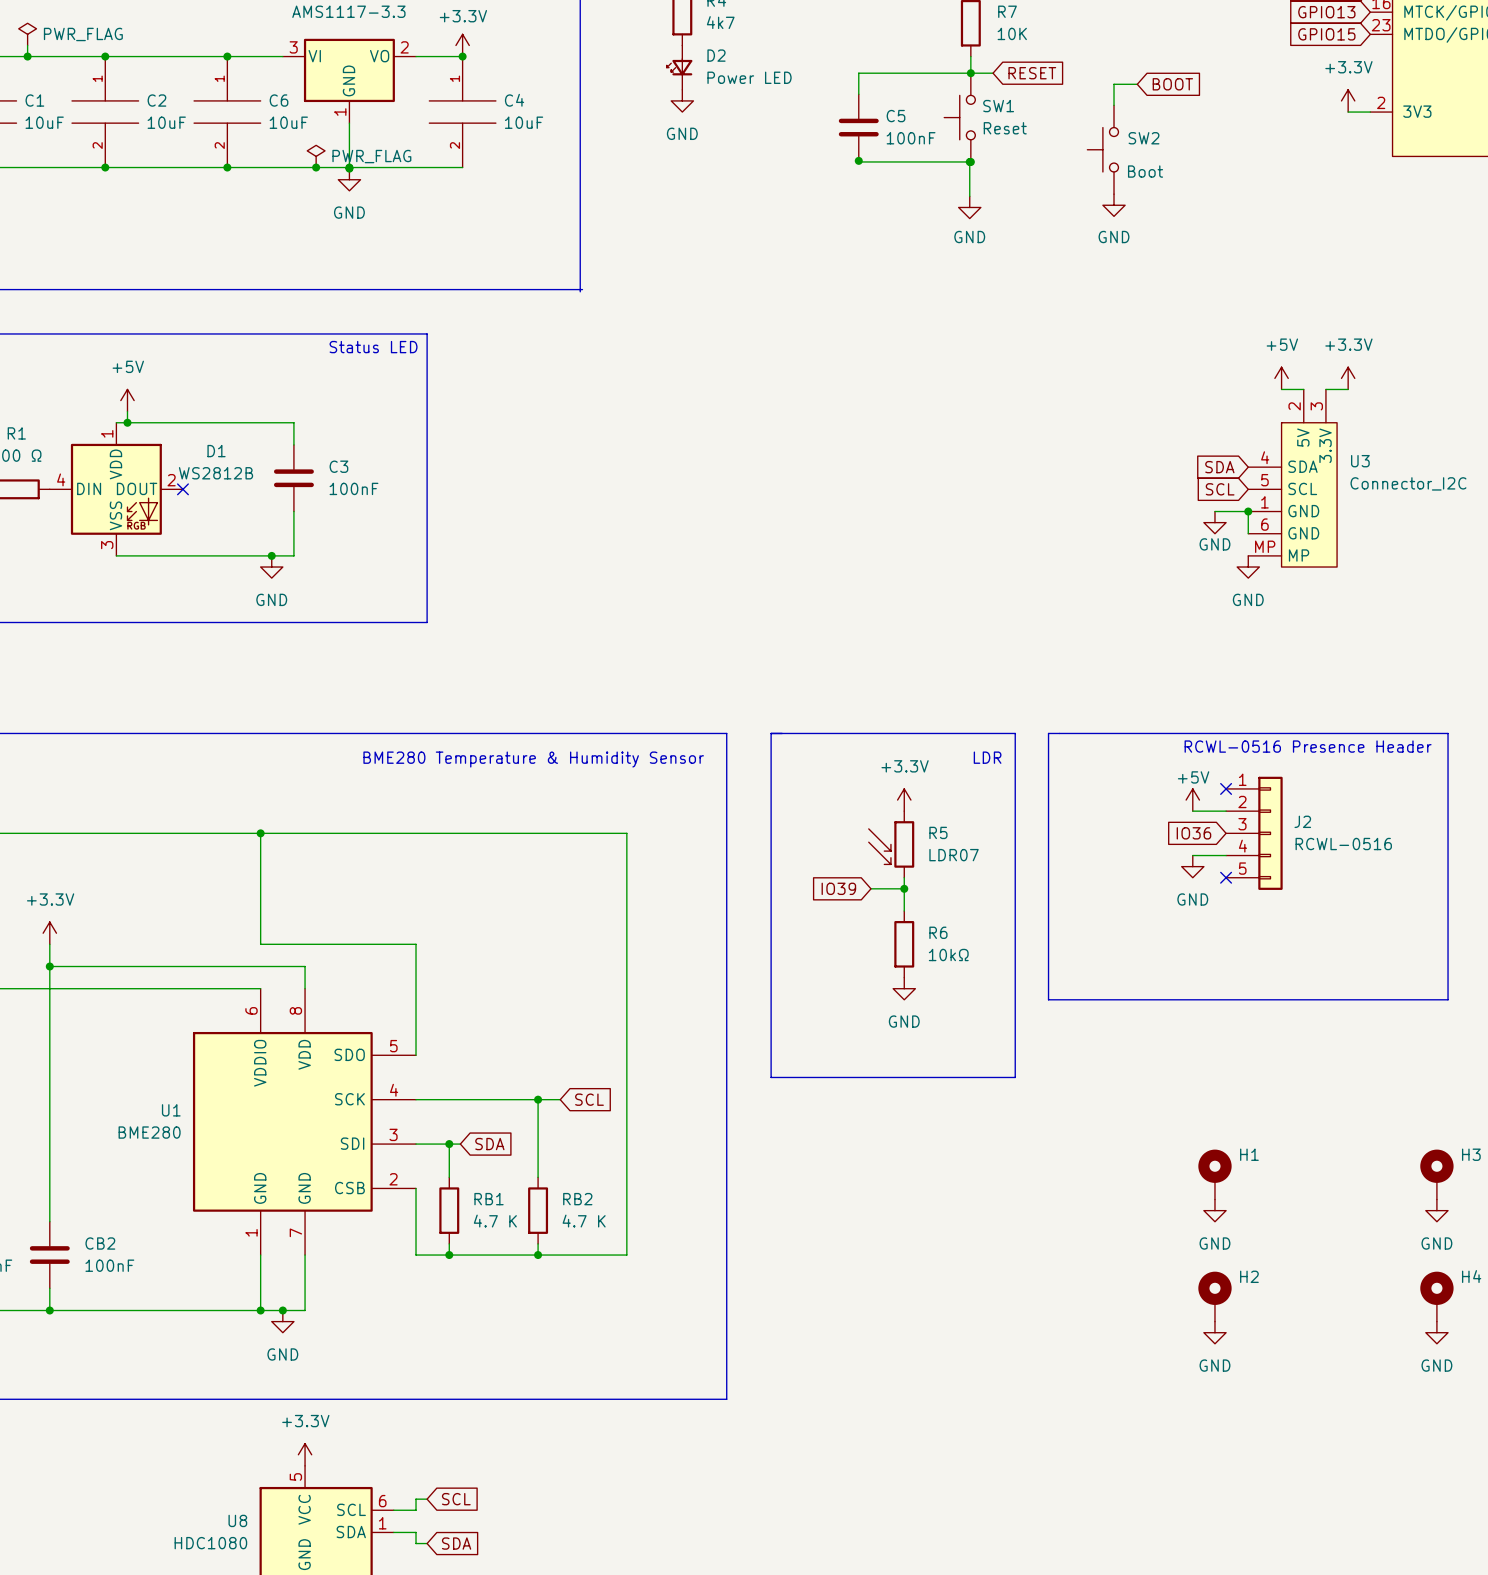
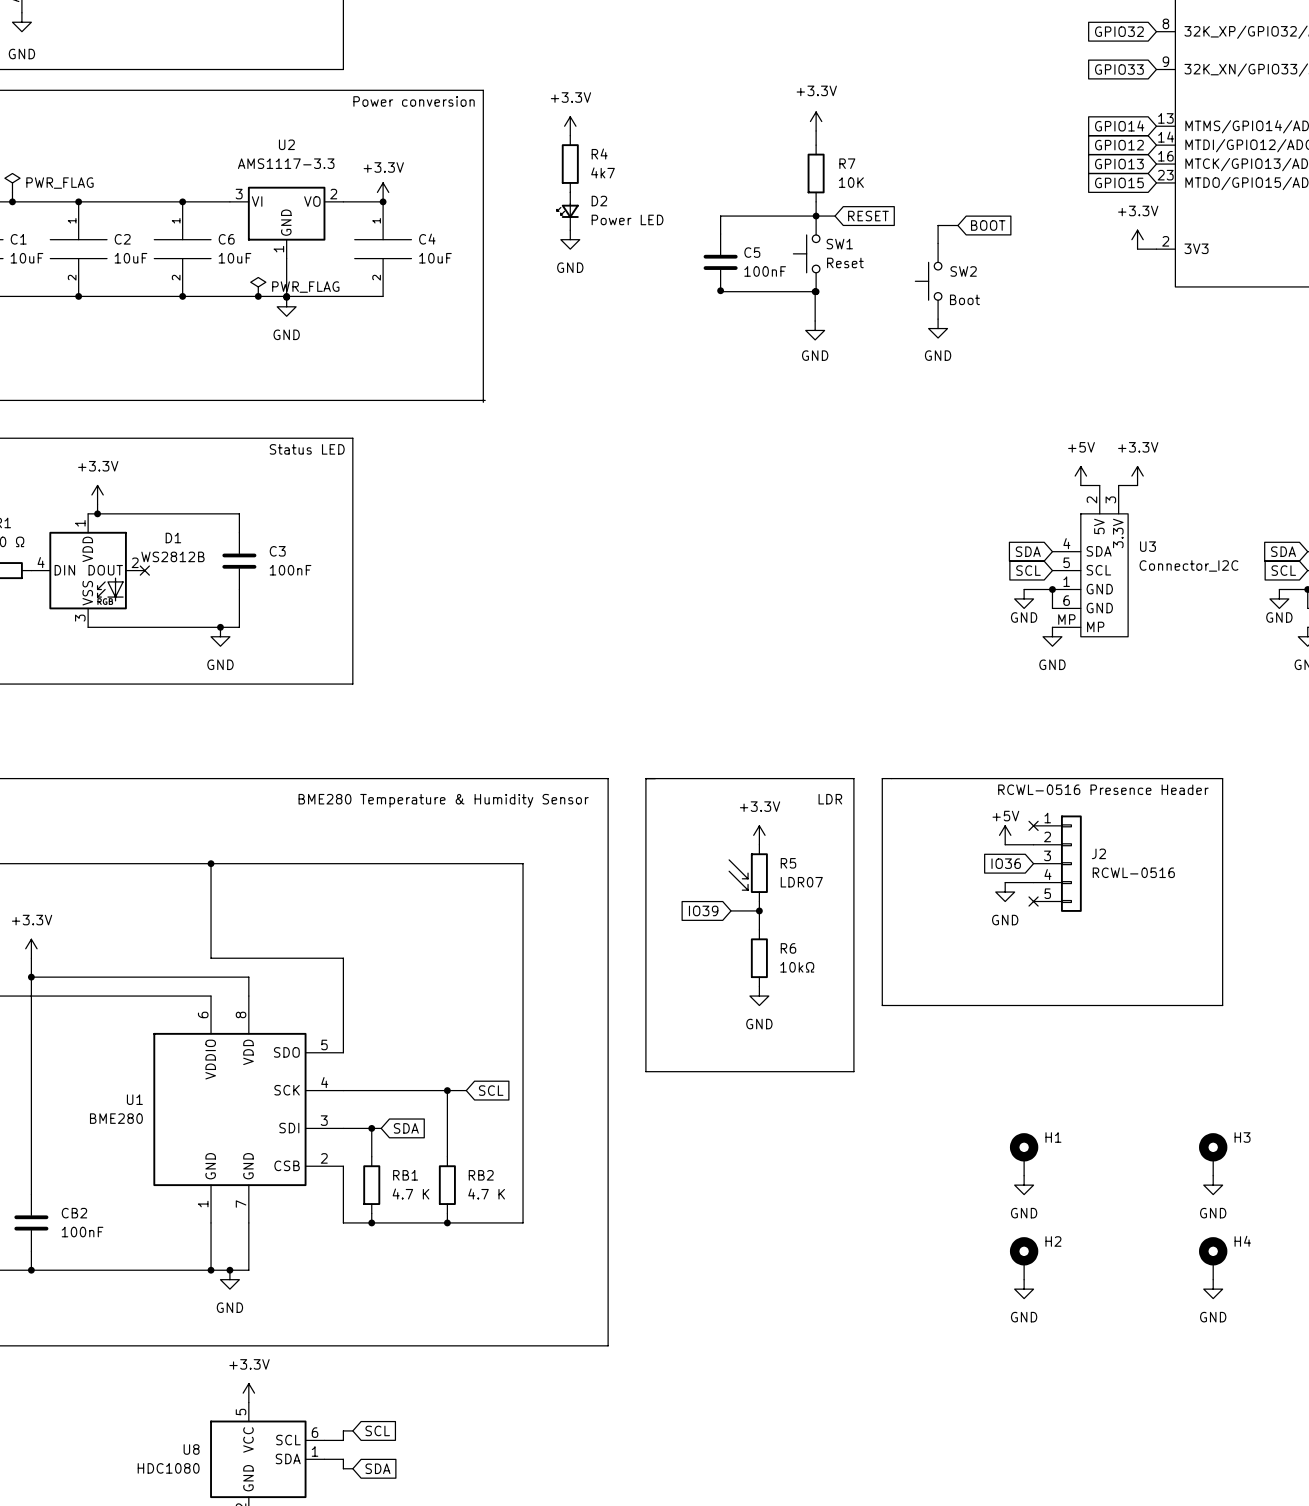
power symbol: +5V (127, 400) -> +3.3V (97, 494)

